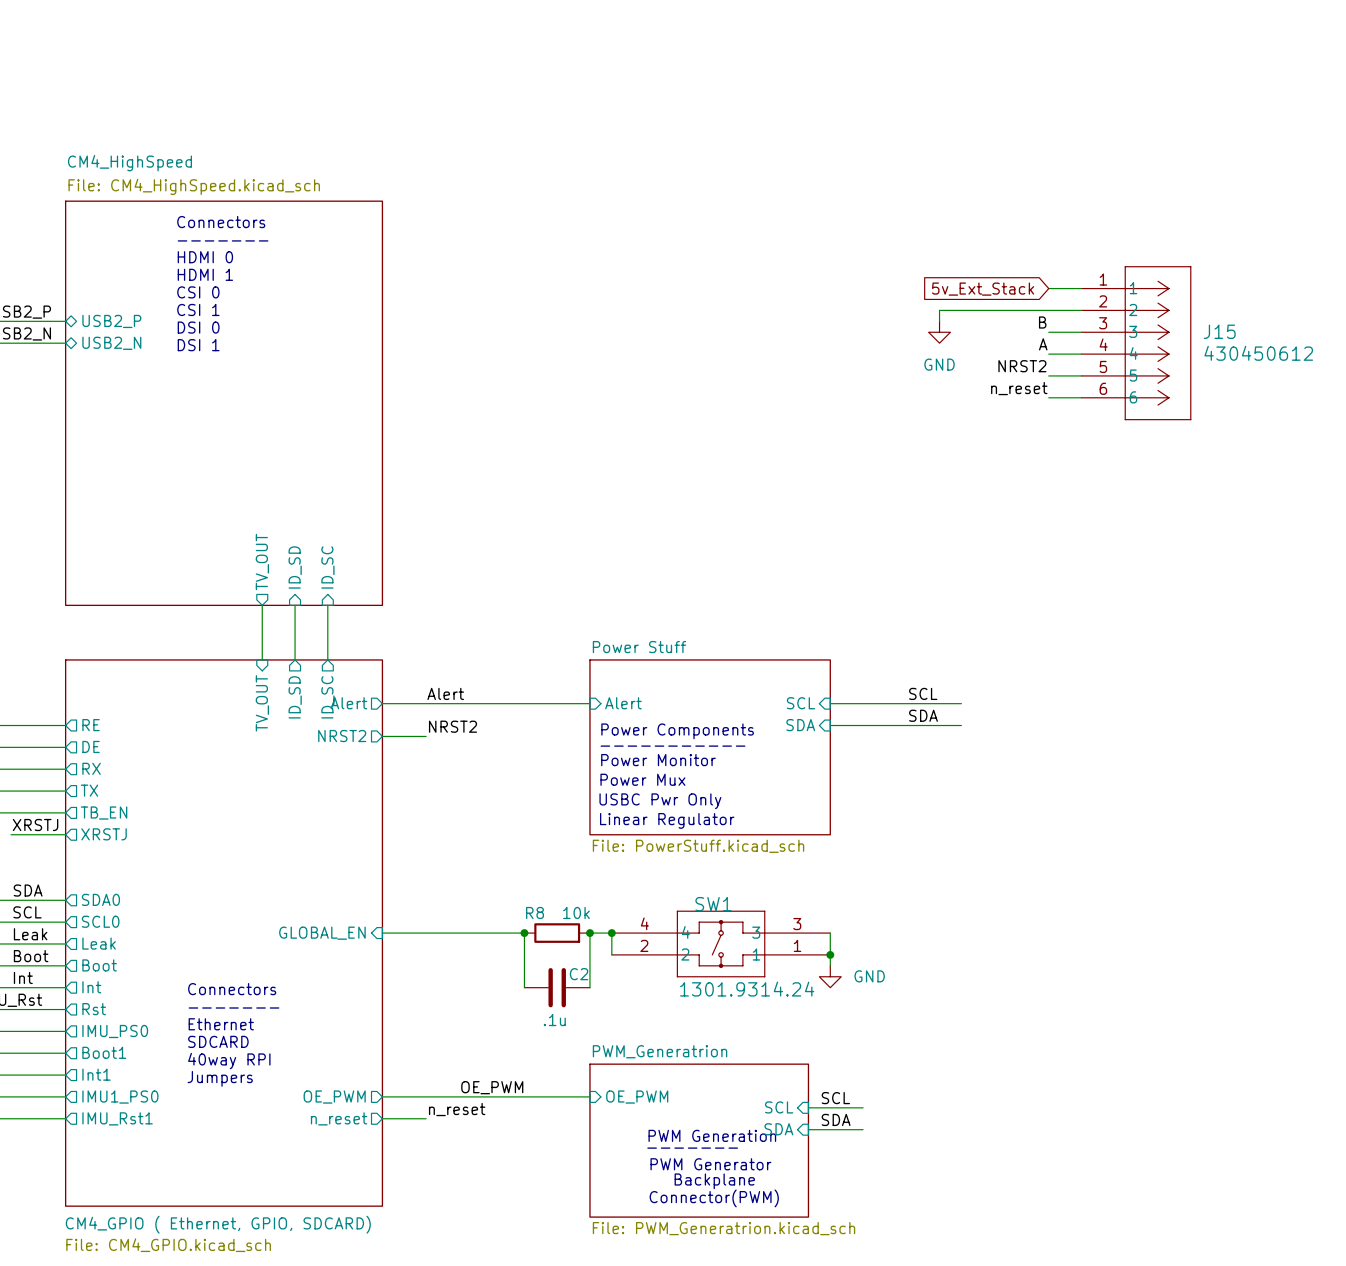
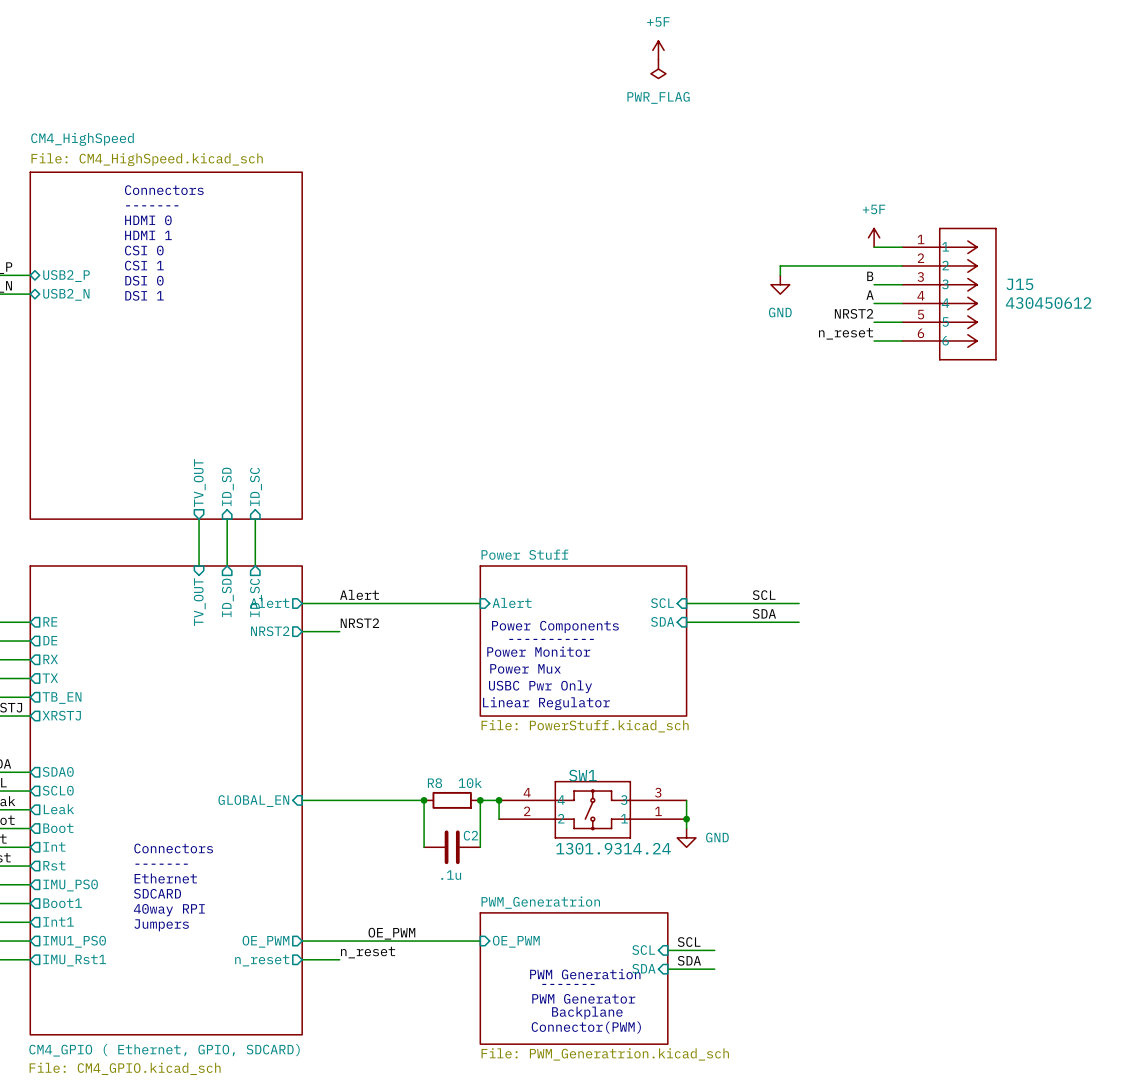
power symbol: none -> +5F (658, 50)
power symbol: none -> PWR_FLAG (658, 69)
power symbol: none -> +5F (874, 237)
global label: 5v_Ext_Stack (983, 289) -> none

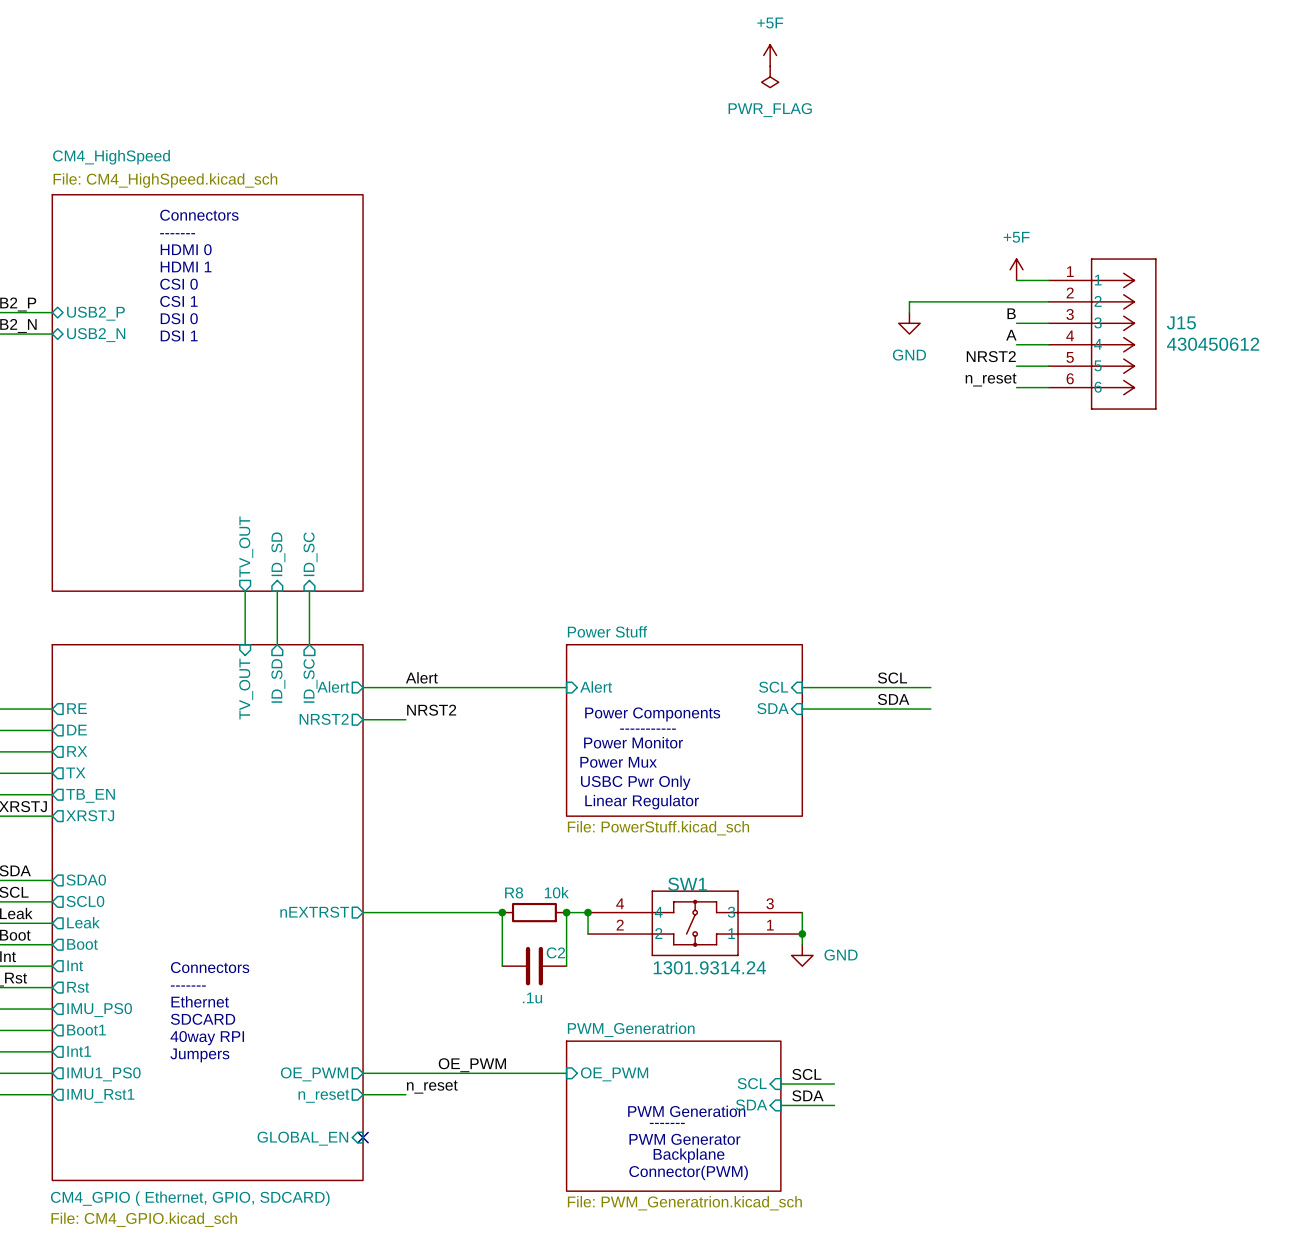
sheet pin shape: input (253, 801) -> output (314, 912)
sheet pin: GLOBAL_EN (253, 801) -> nEXTRST (314, 912)
sheet pin: none -> GLOBAL_EN (302, 1138)
no-connect mark: none -> (363, 1137)

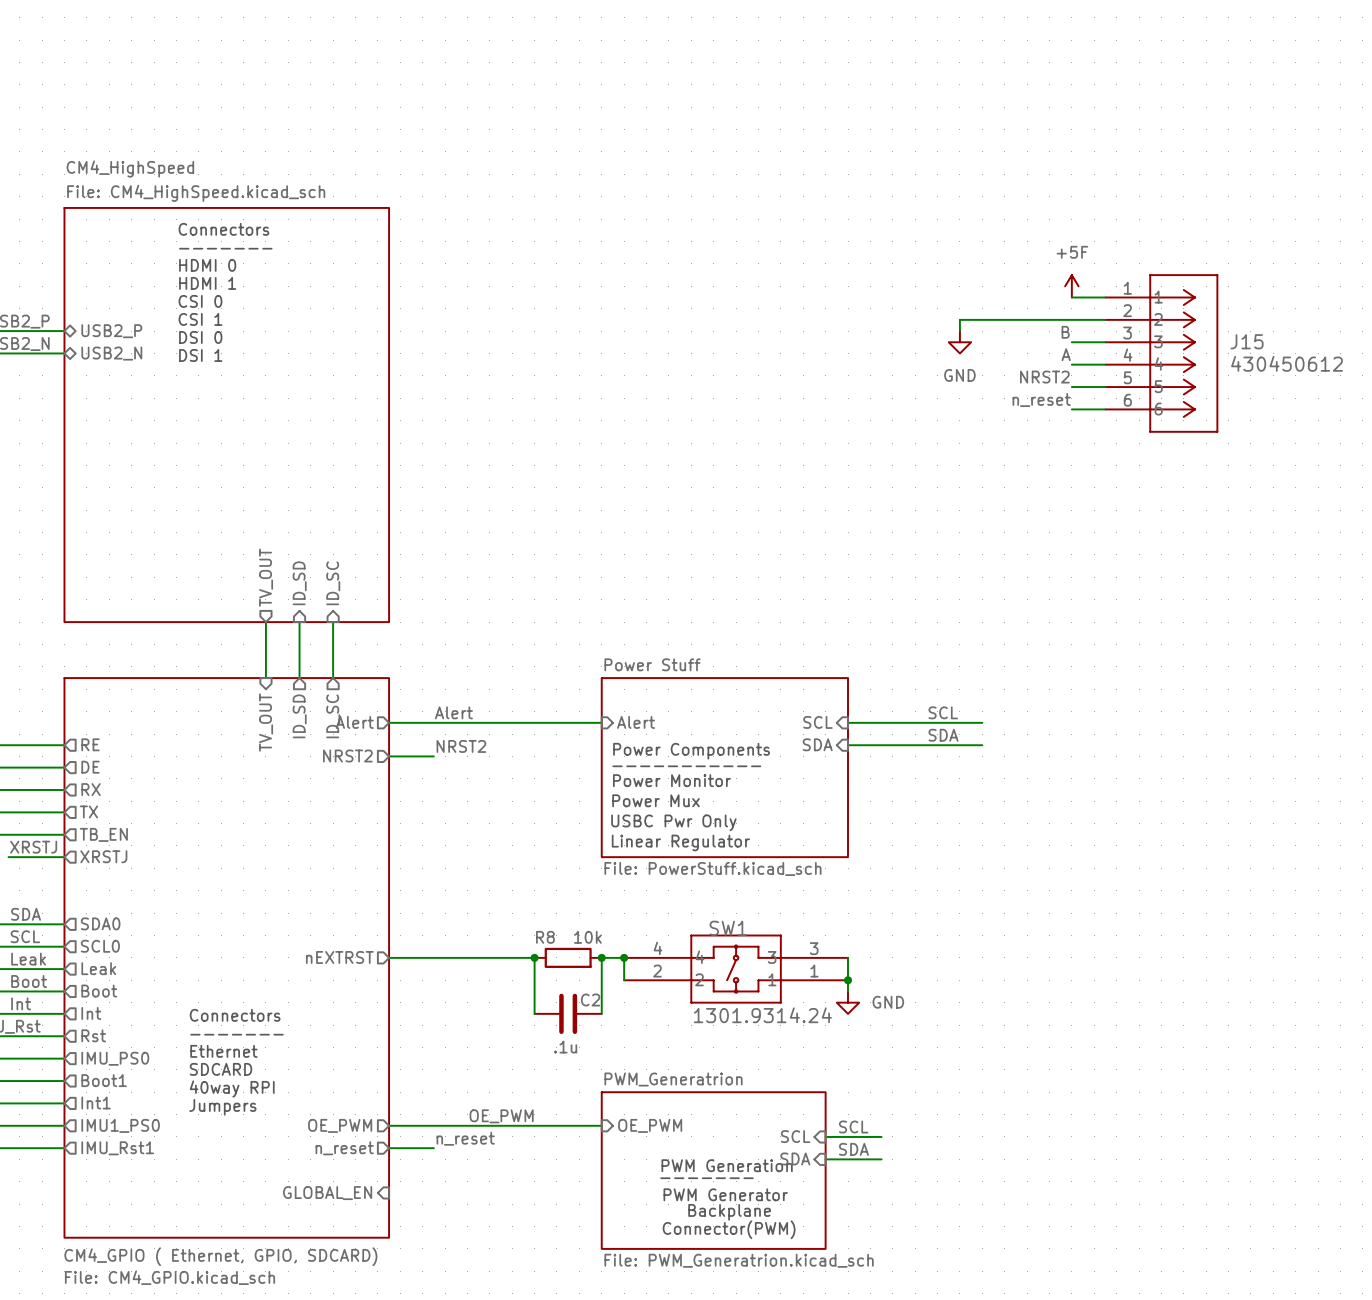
power symbol: +5F (770, 55) -> none
power symbol: PWR_FLAG (770, 76) -> none
no-connect mark: (363, 1137) -> none

